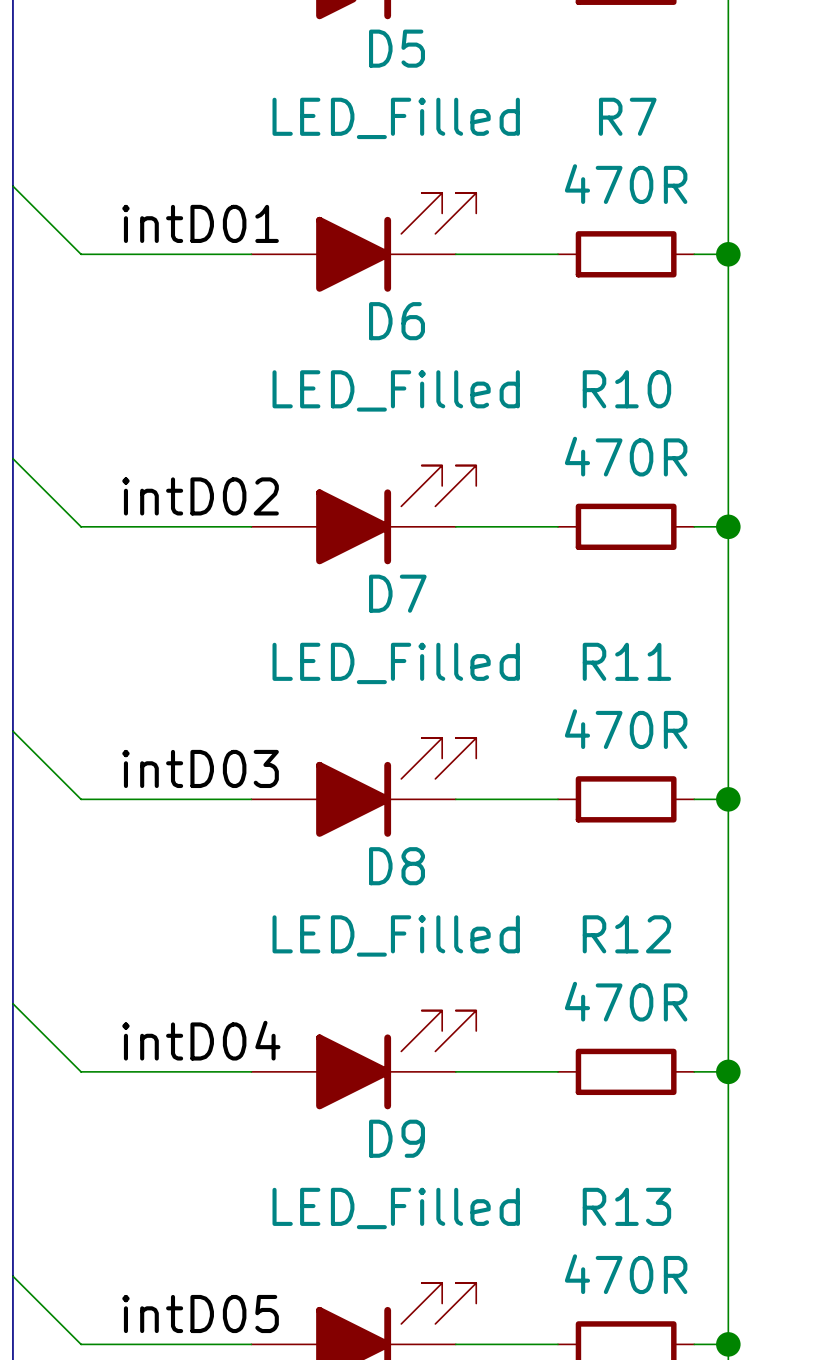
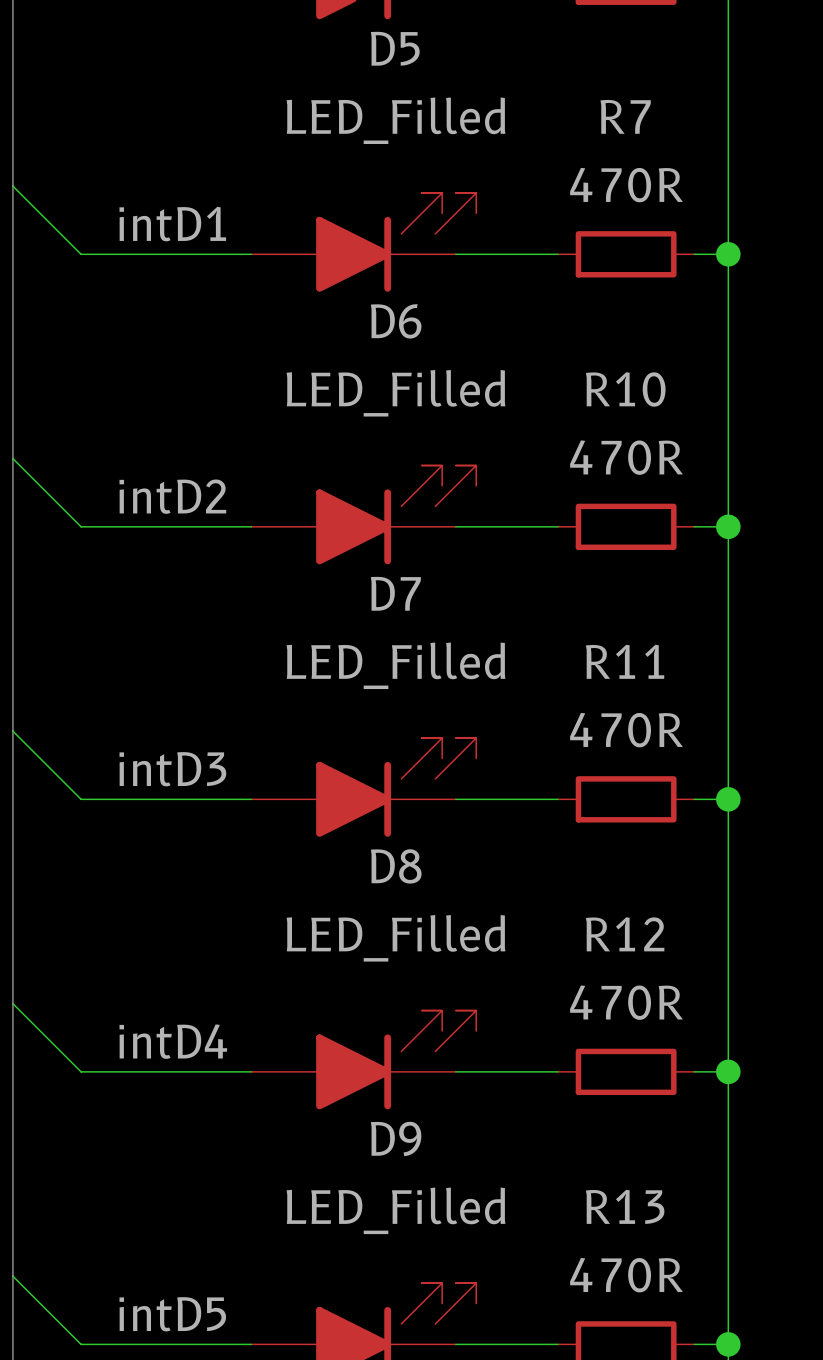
label: intD01 (200, 223) -> intD1 (172, 224)
label: intD02 (200, 496) -> intD2 (172, 496)
label: intD03 (200, 768) -> intD3 (172, 769)
label: intD04 (201, 1040) -> intD4 (173, 1041)
label: intD05 (200, 1314) -> intD5 (172, 1314)

